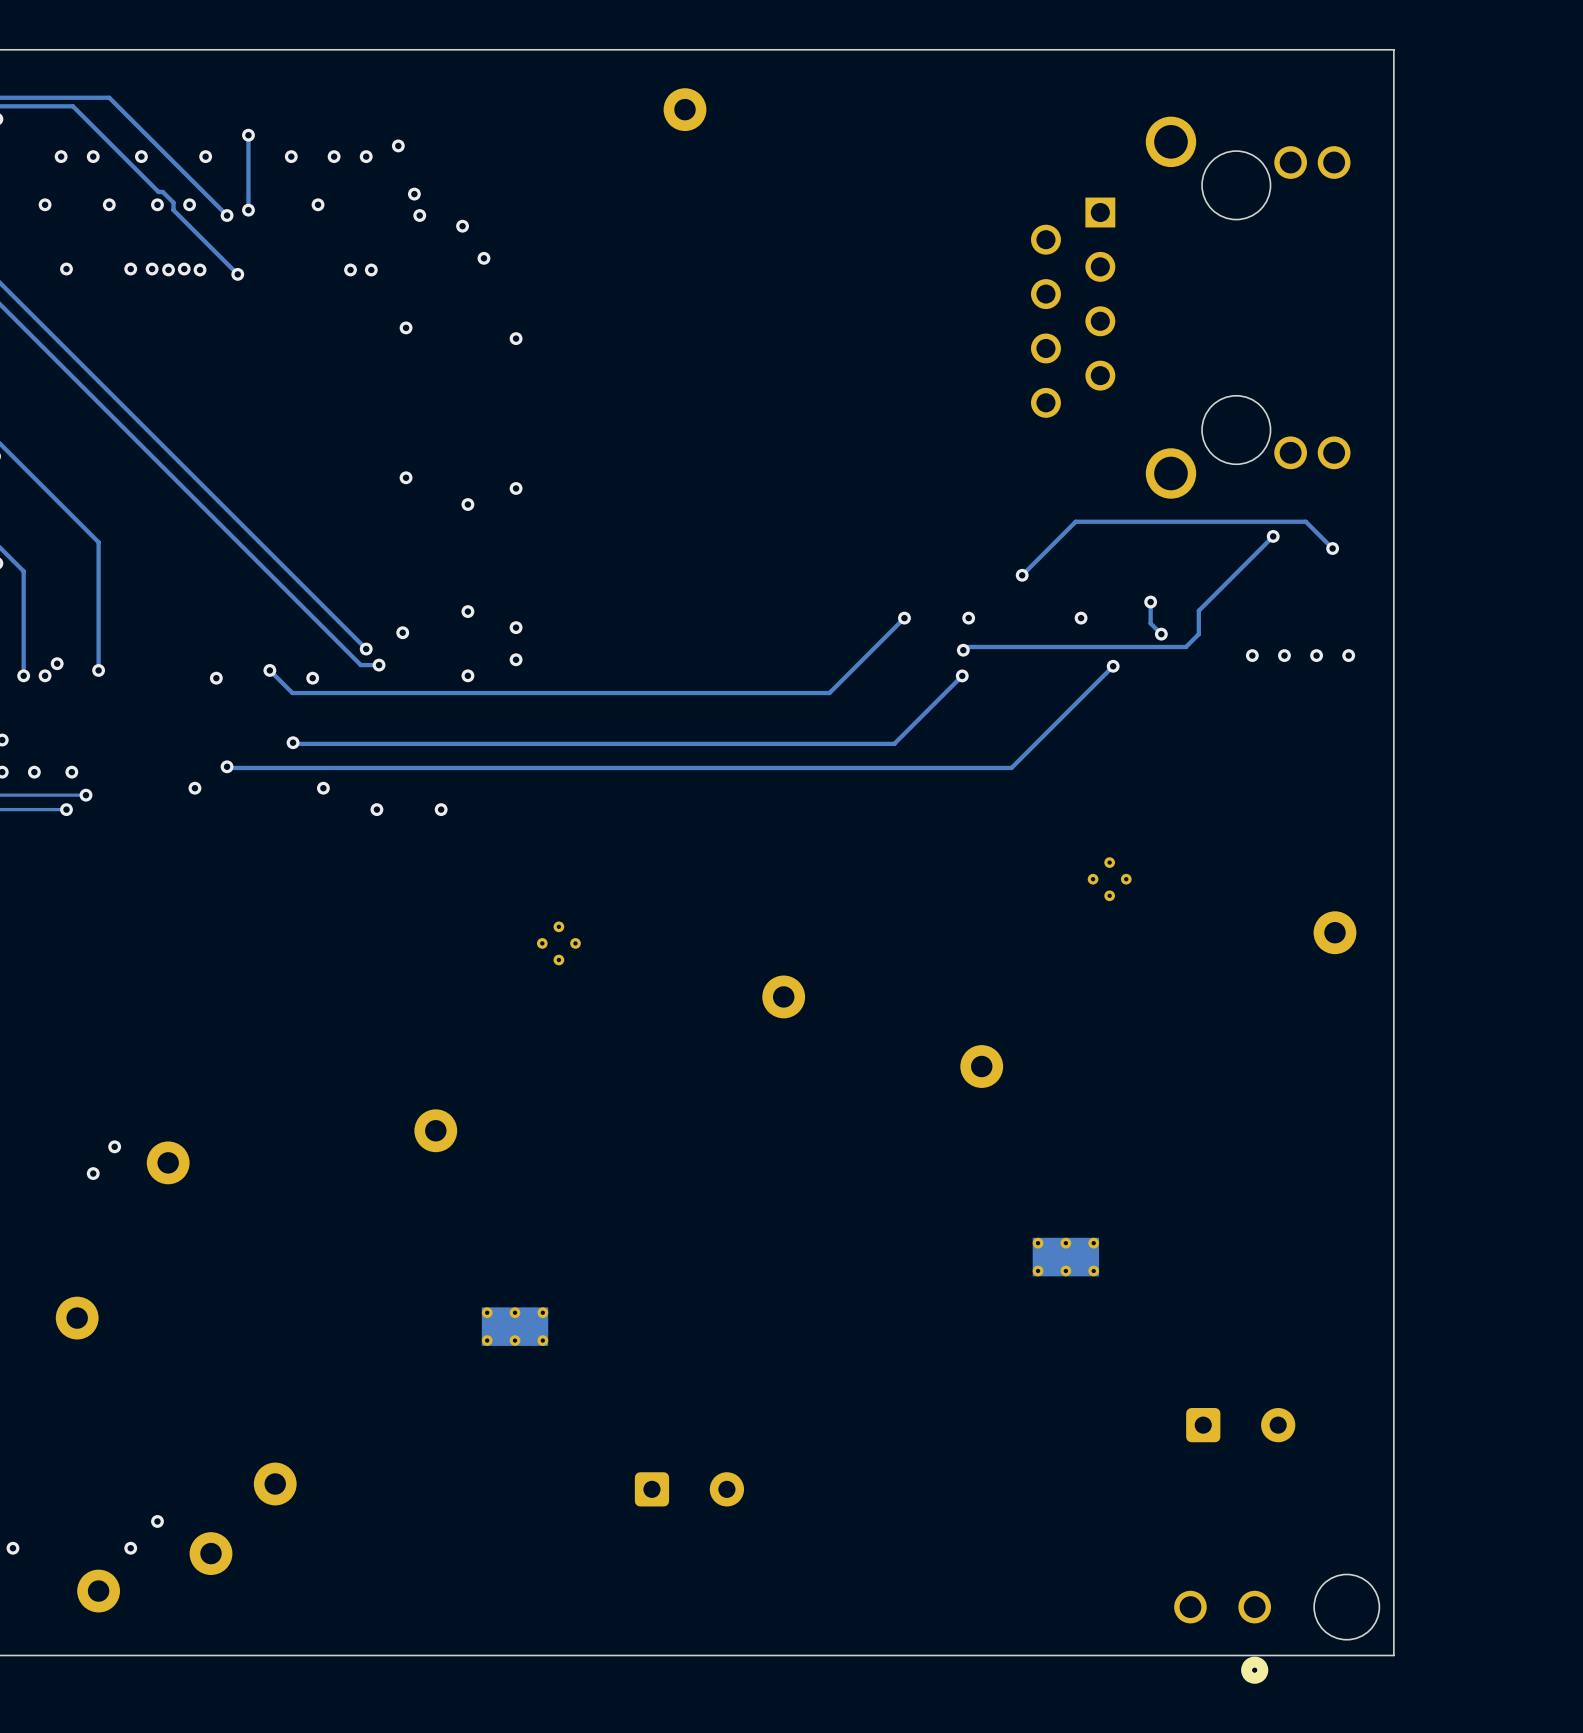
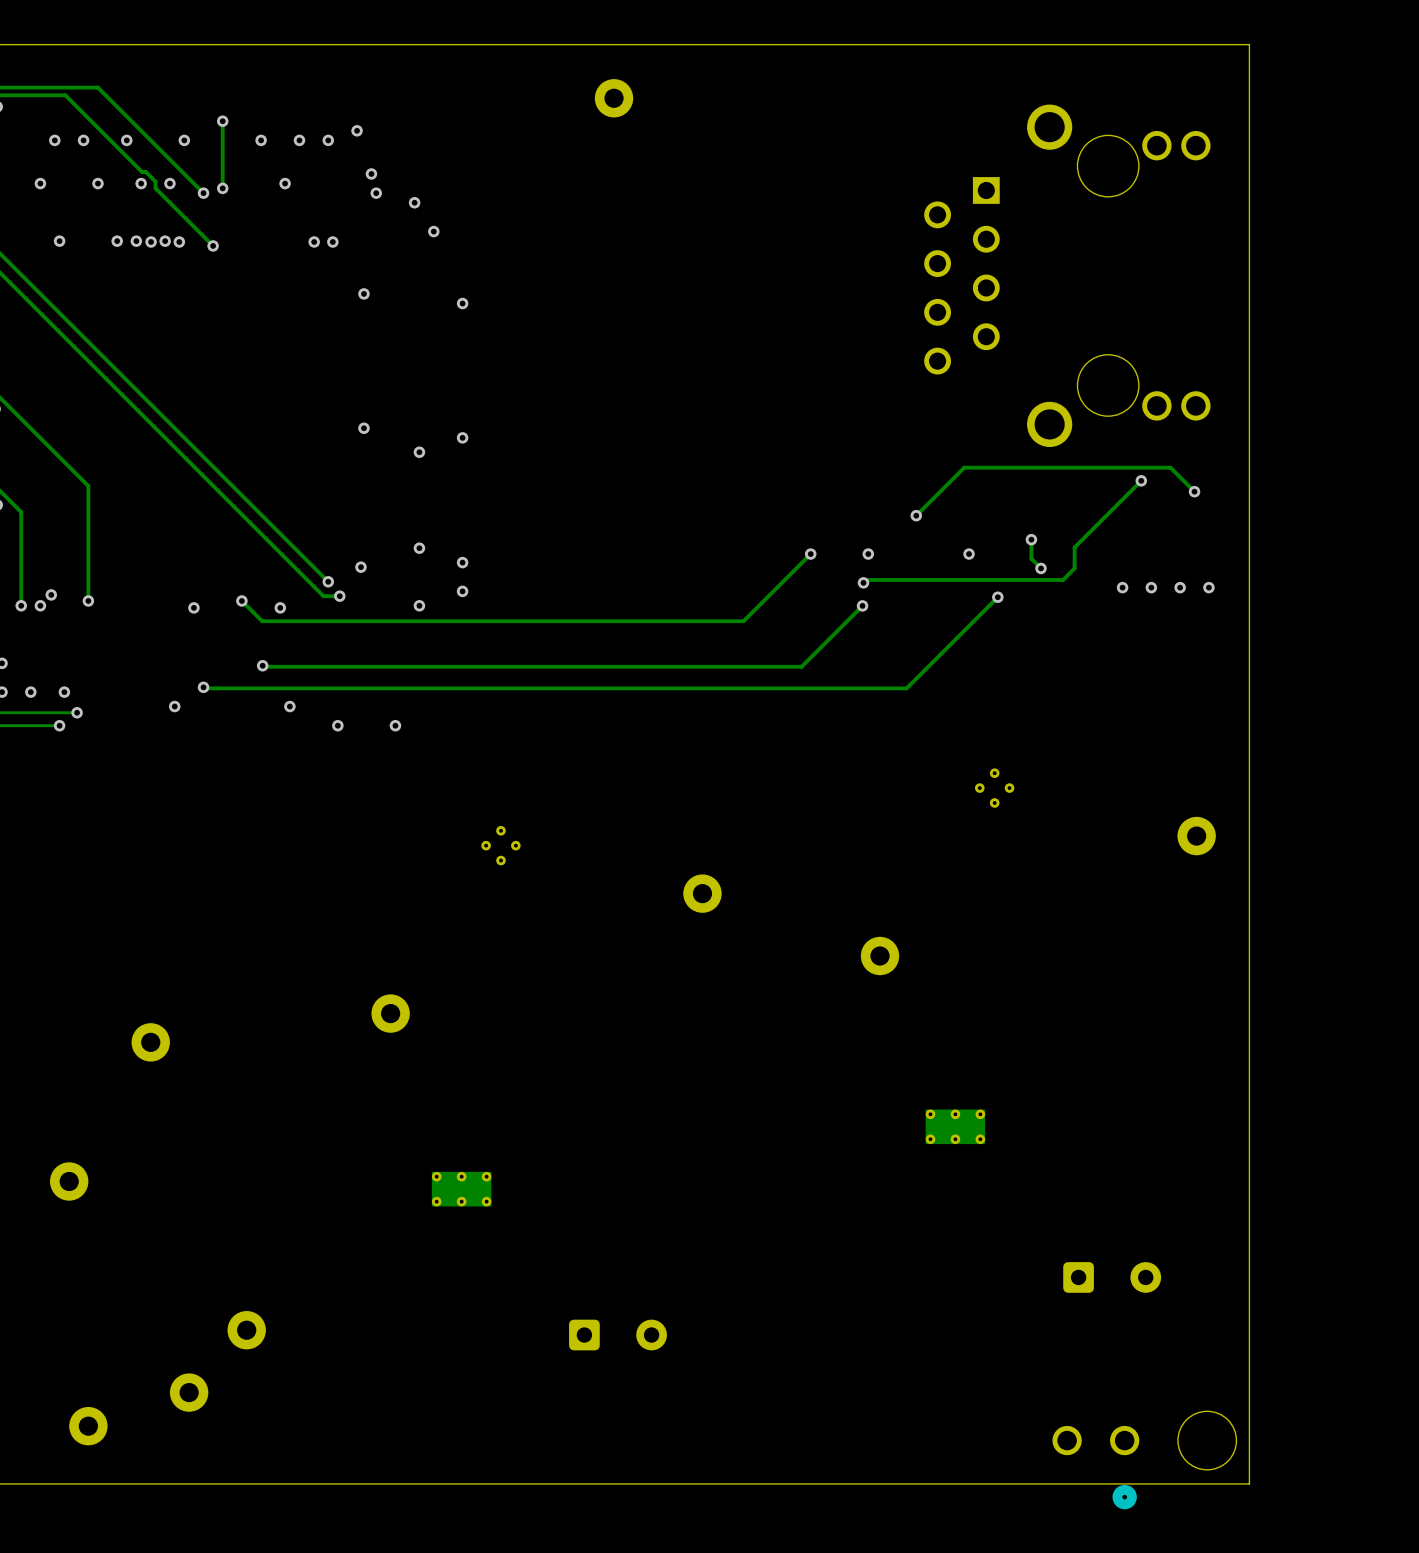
via: (114, 1146) -> none
via: (93, 1173) -> none
via: (157, 1521) -> none
via: (12, 1548) -> none
via: (130, 1548) -> none

